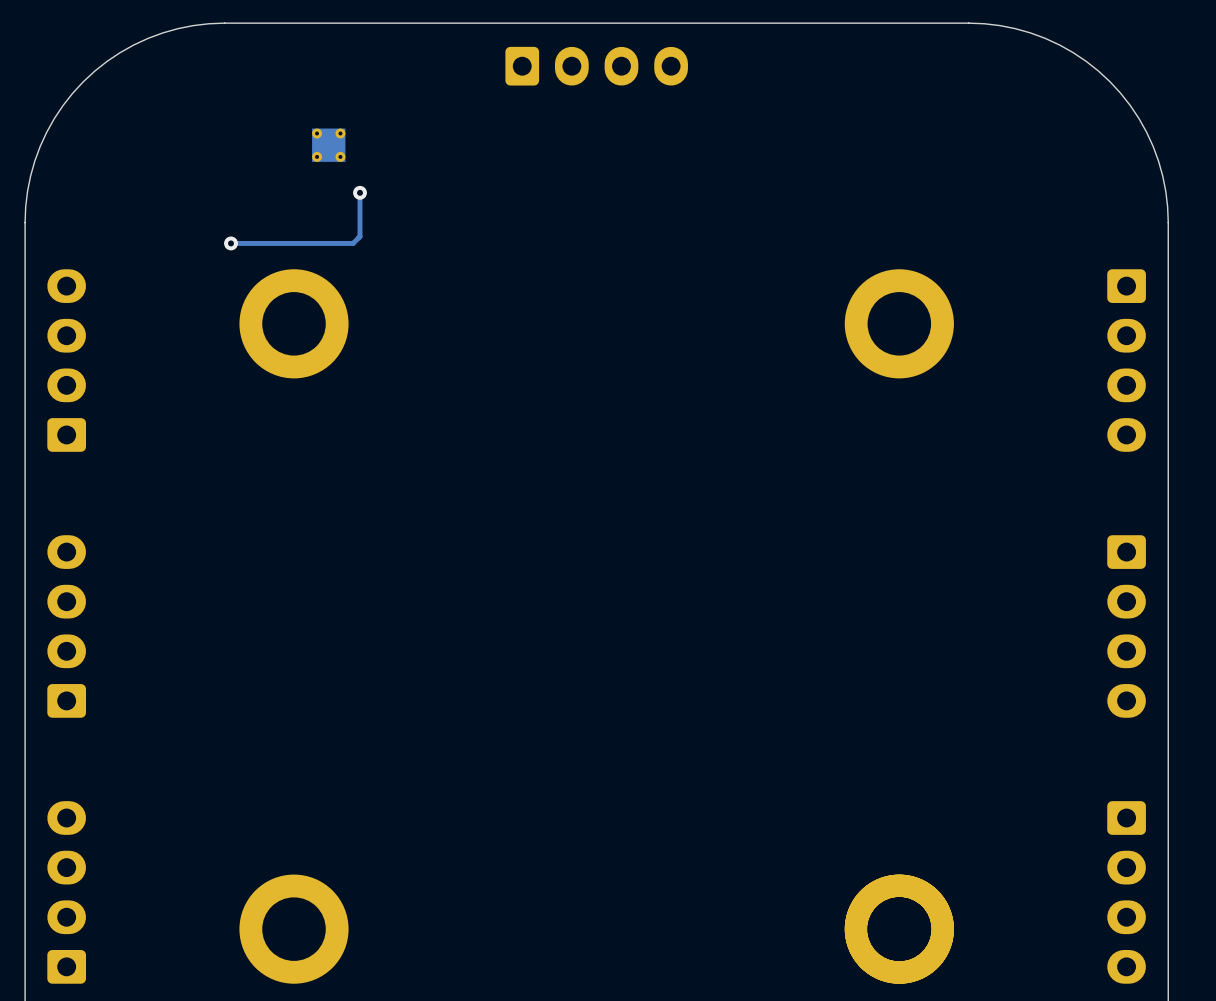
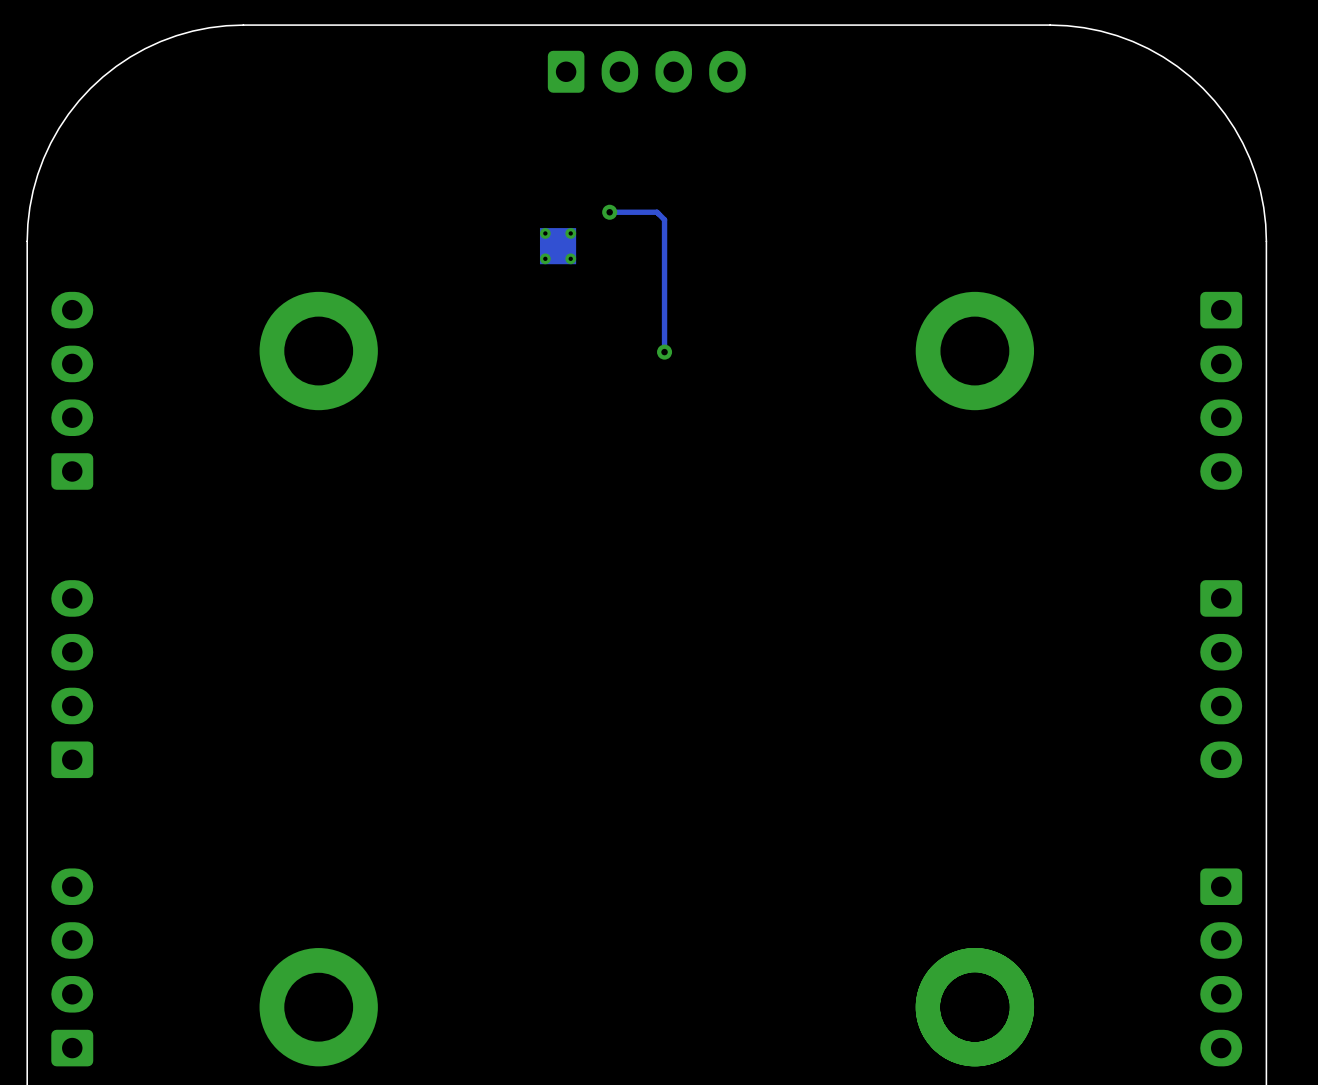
part position: (328, 145) -> (558, 246)
track: (360, 192) (360, 236) (353, 243) (231, 243) -> none
via: (360, 192) -> none
track: none -> (609, 212) (657, 212) (664, 219) (664, 352)
via: none -> (609, 212)
via: (231, 243) -> none
via: none -> (664, 352)

